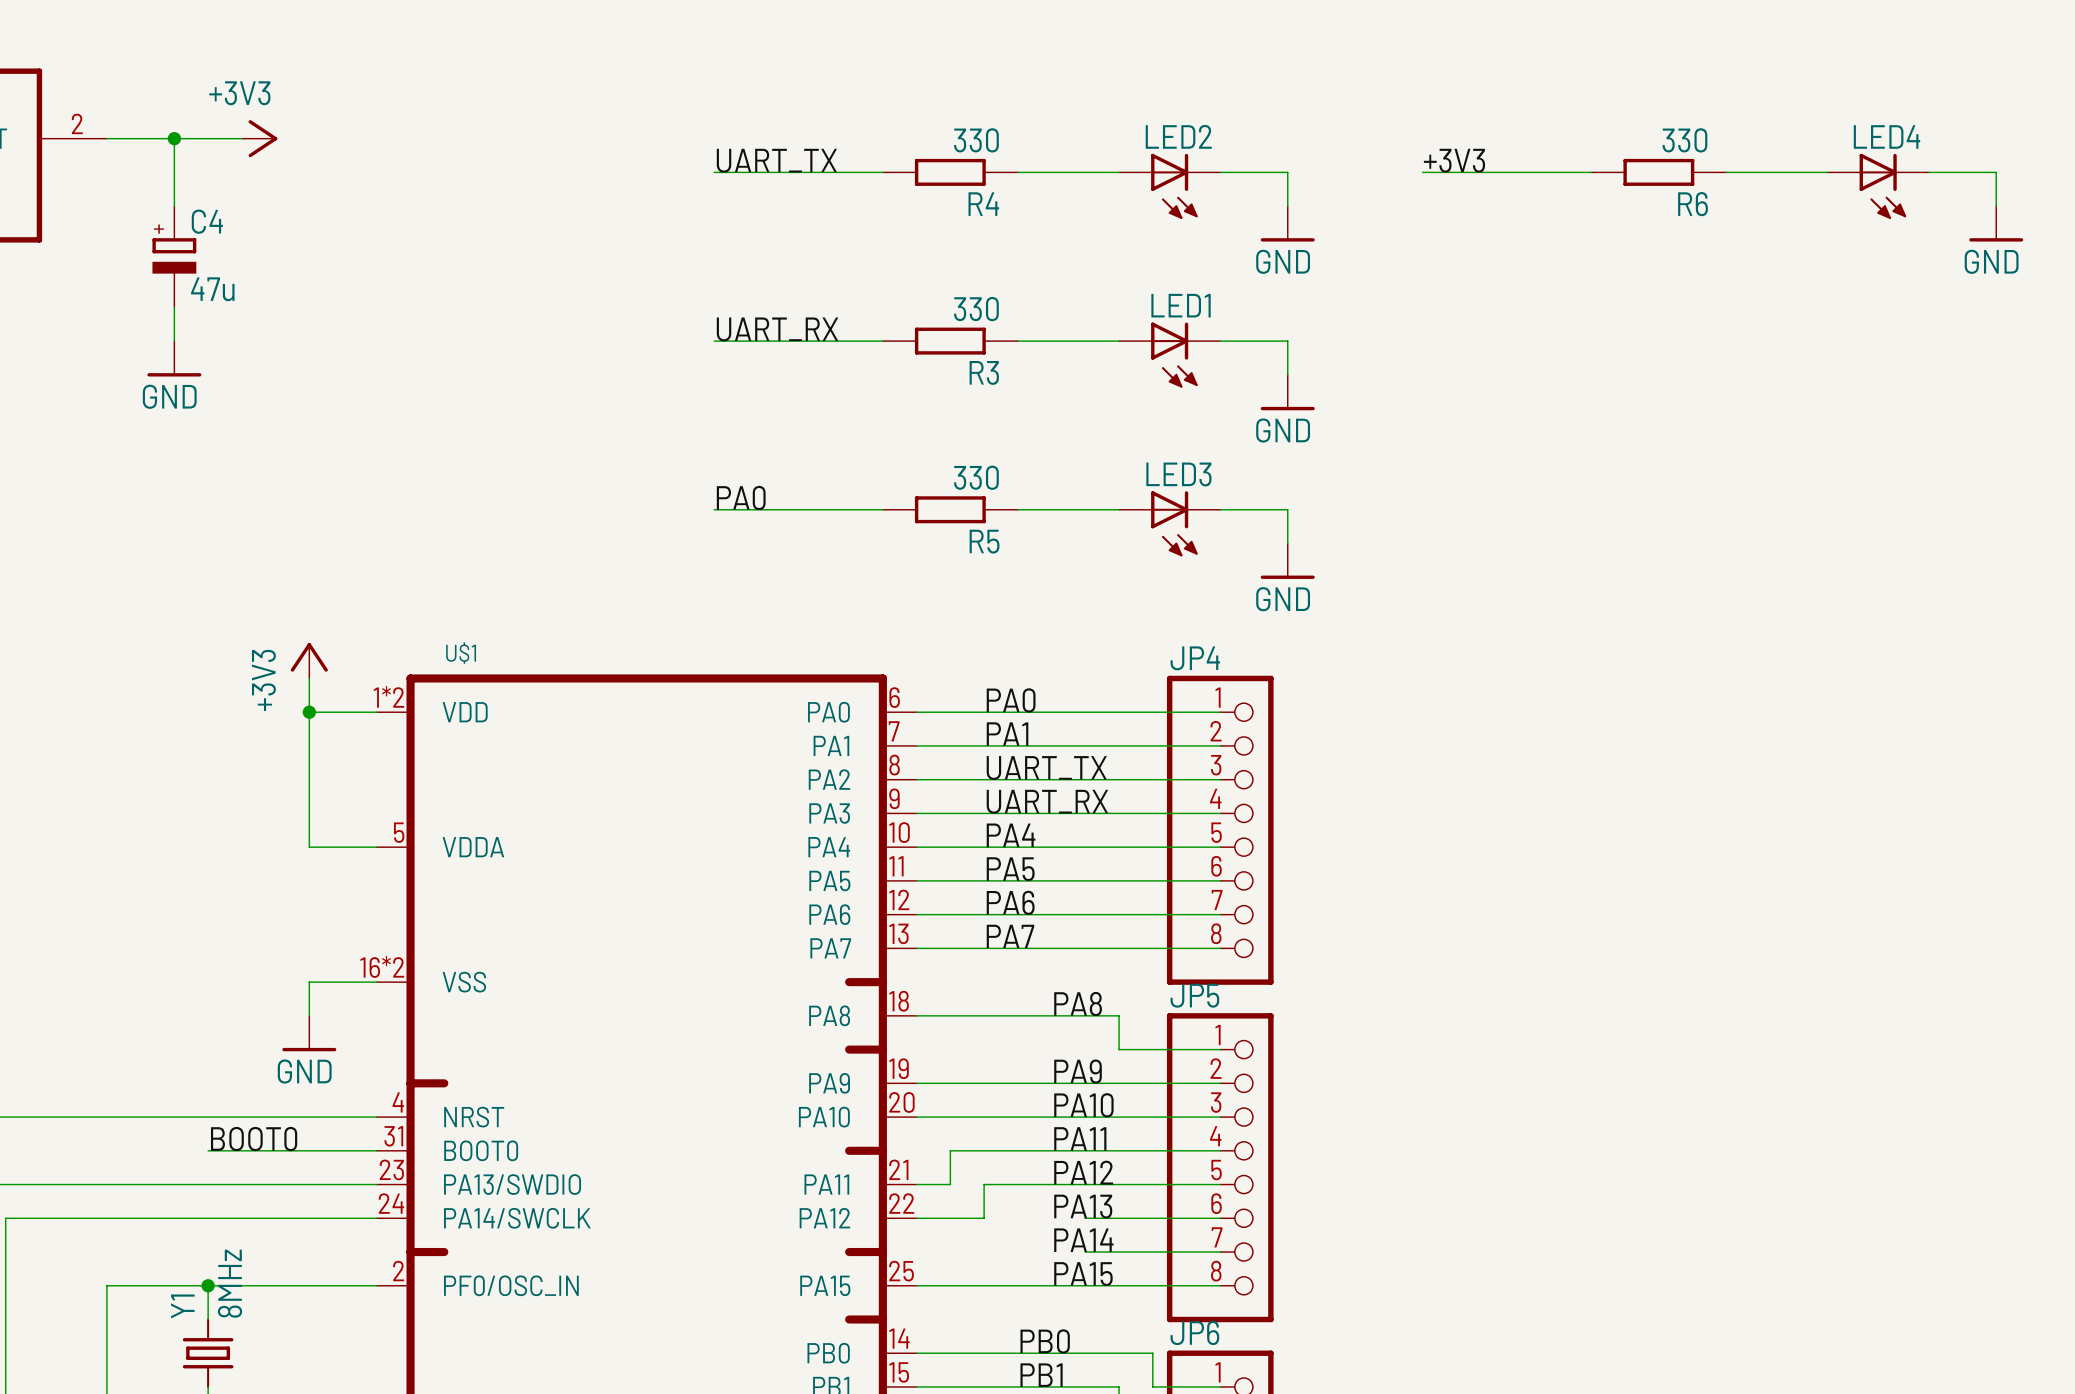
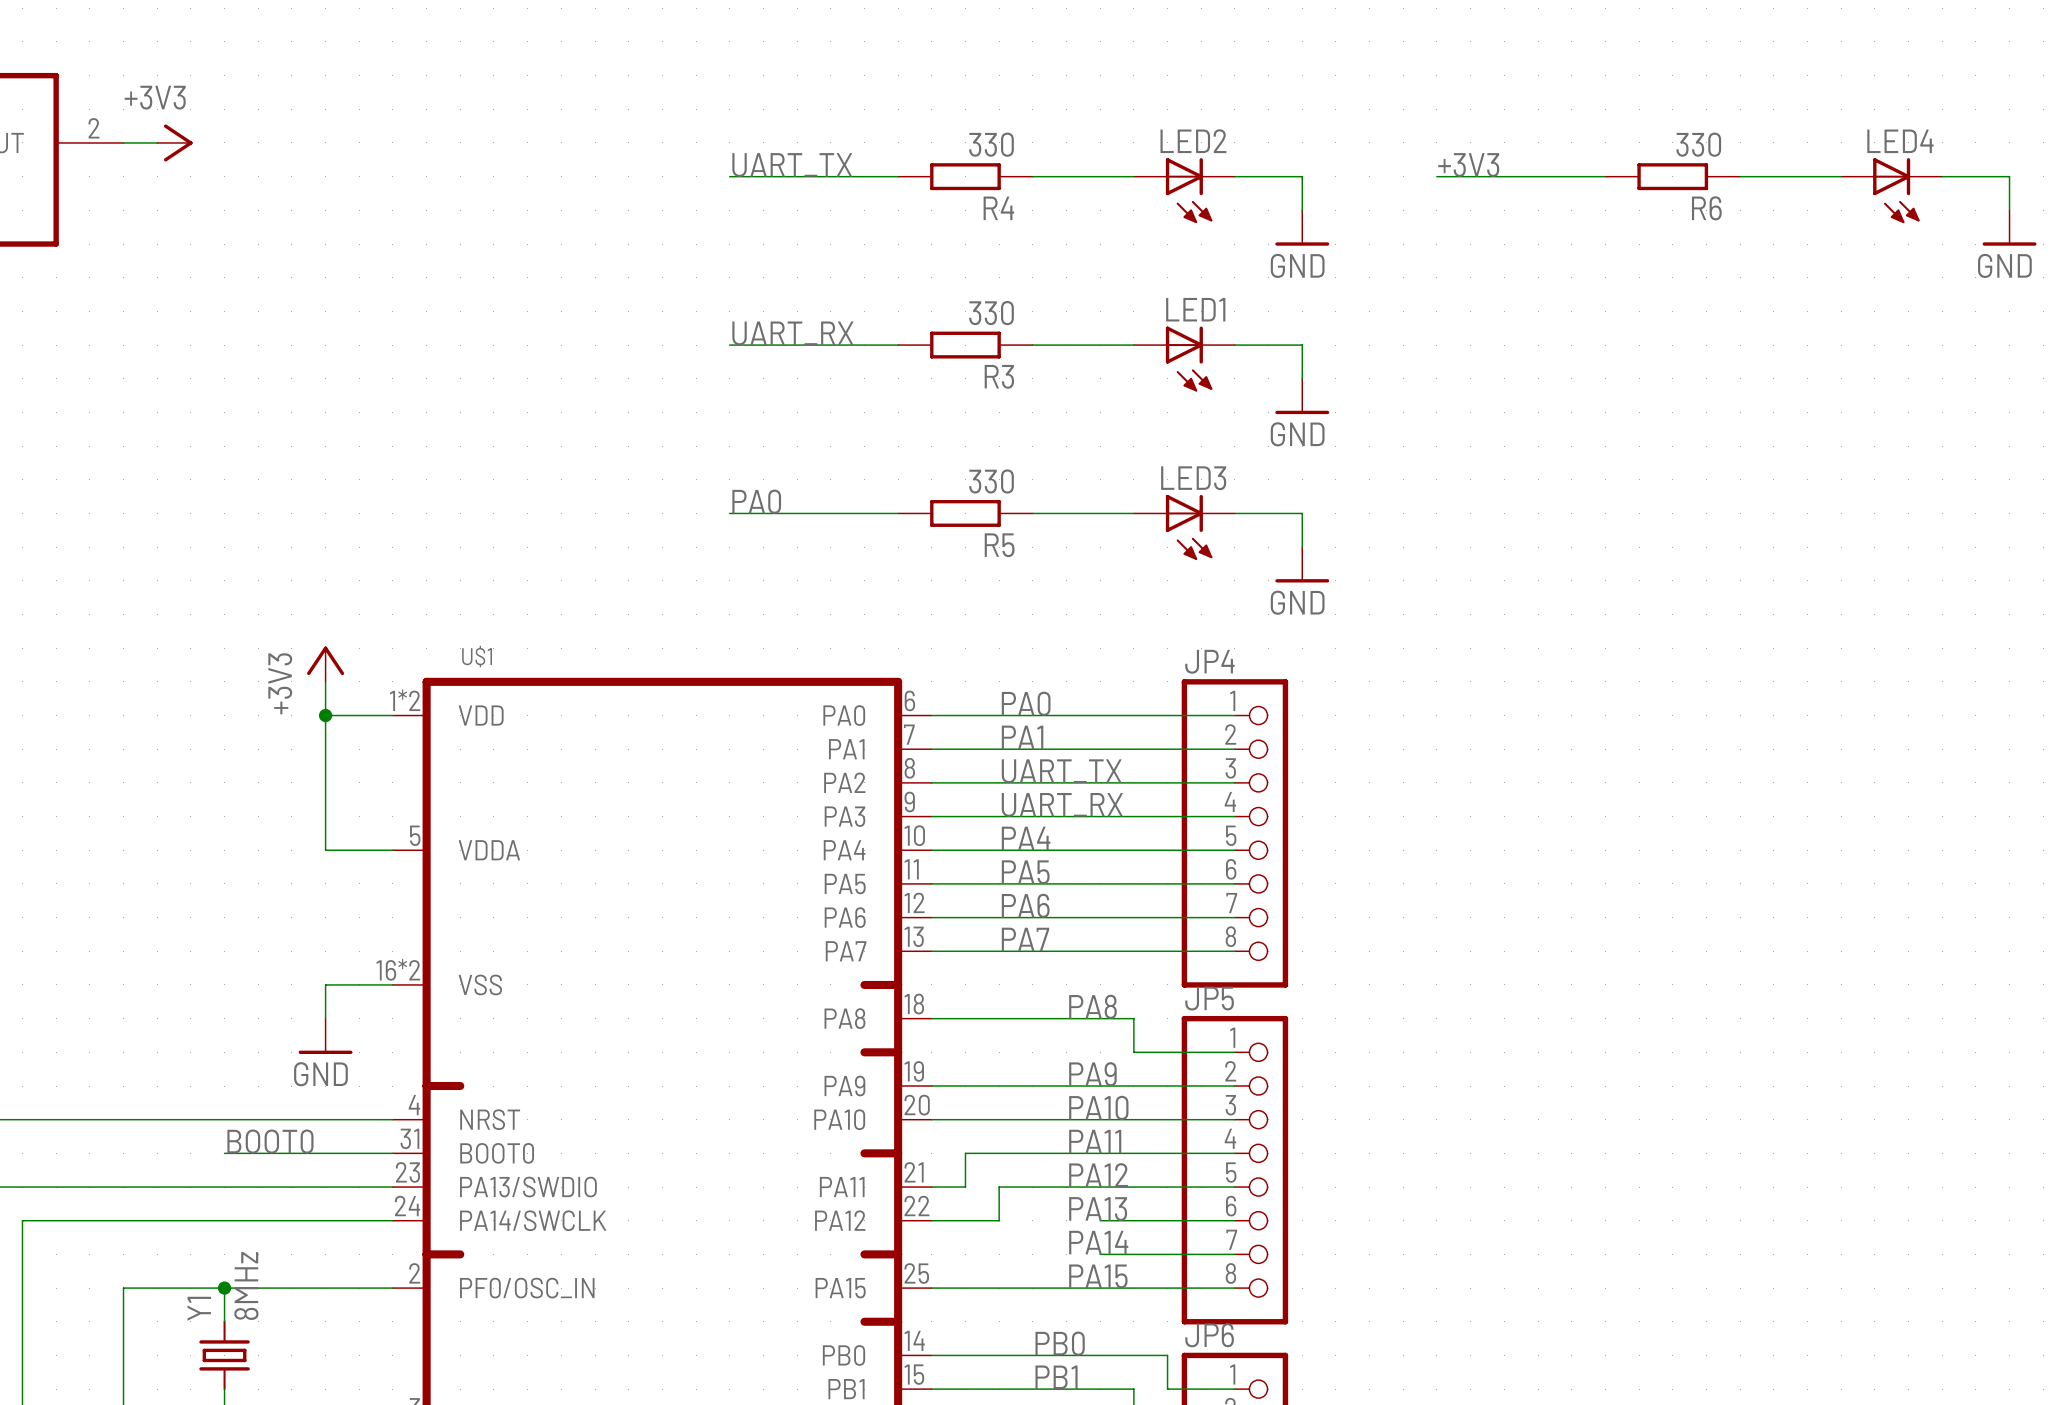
wire: (140, 138) (241, 138) -> none
wire: (174, 138) (174, 206) -> none
junction: (174, 138) -> none
power symbol position: +3V3 (259, 138) -> +3V3 (174, 142)
C4: 47u (174, 256) -> none
wire: (174, 307) (174, 341) -> none
power symbol: GND (174, 358) -> none

